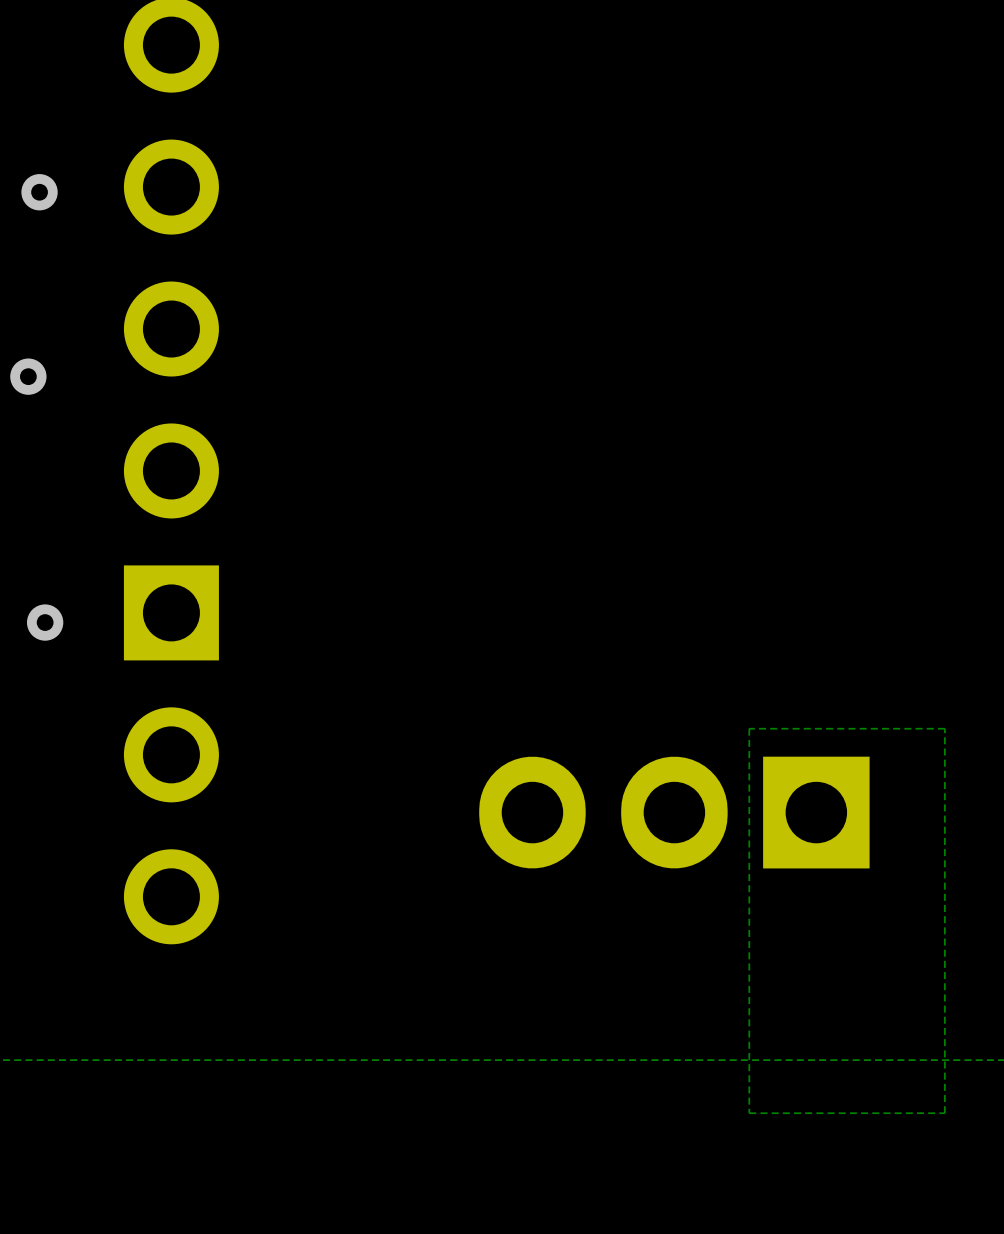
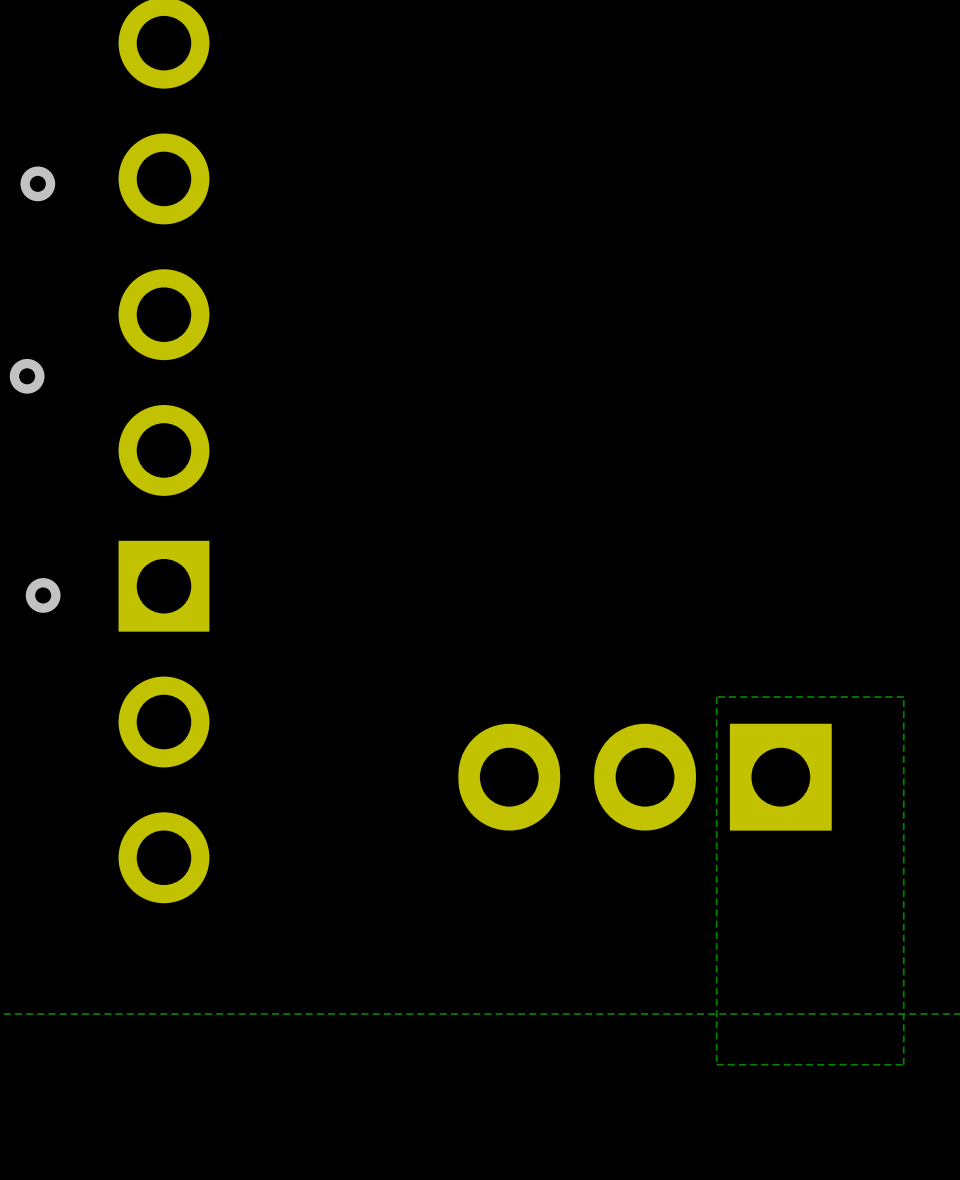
via position: (28, 376) -> (27, 376)

